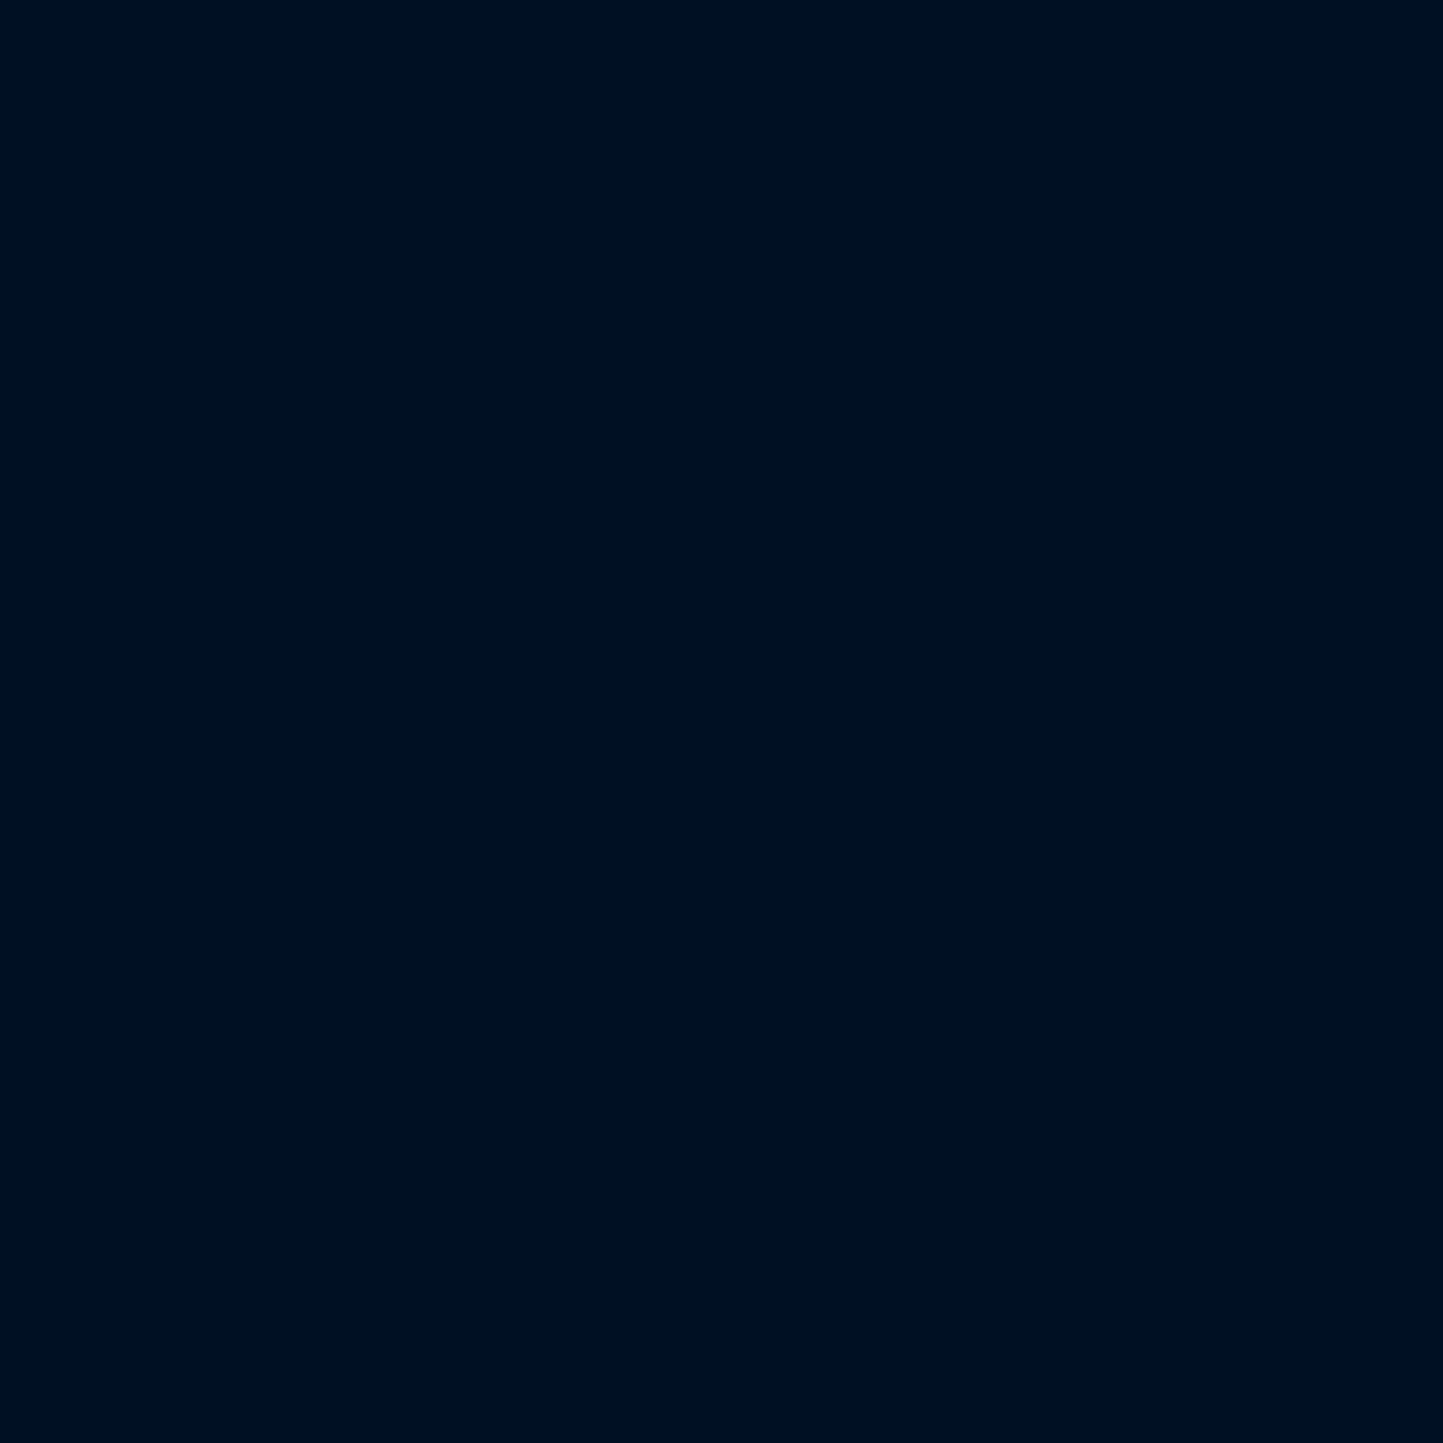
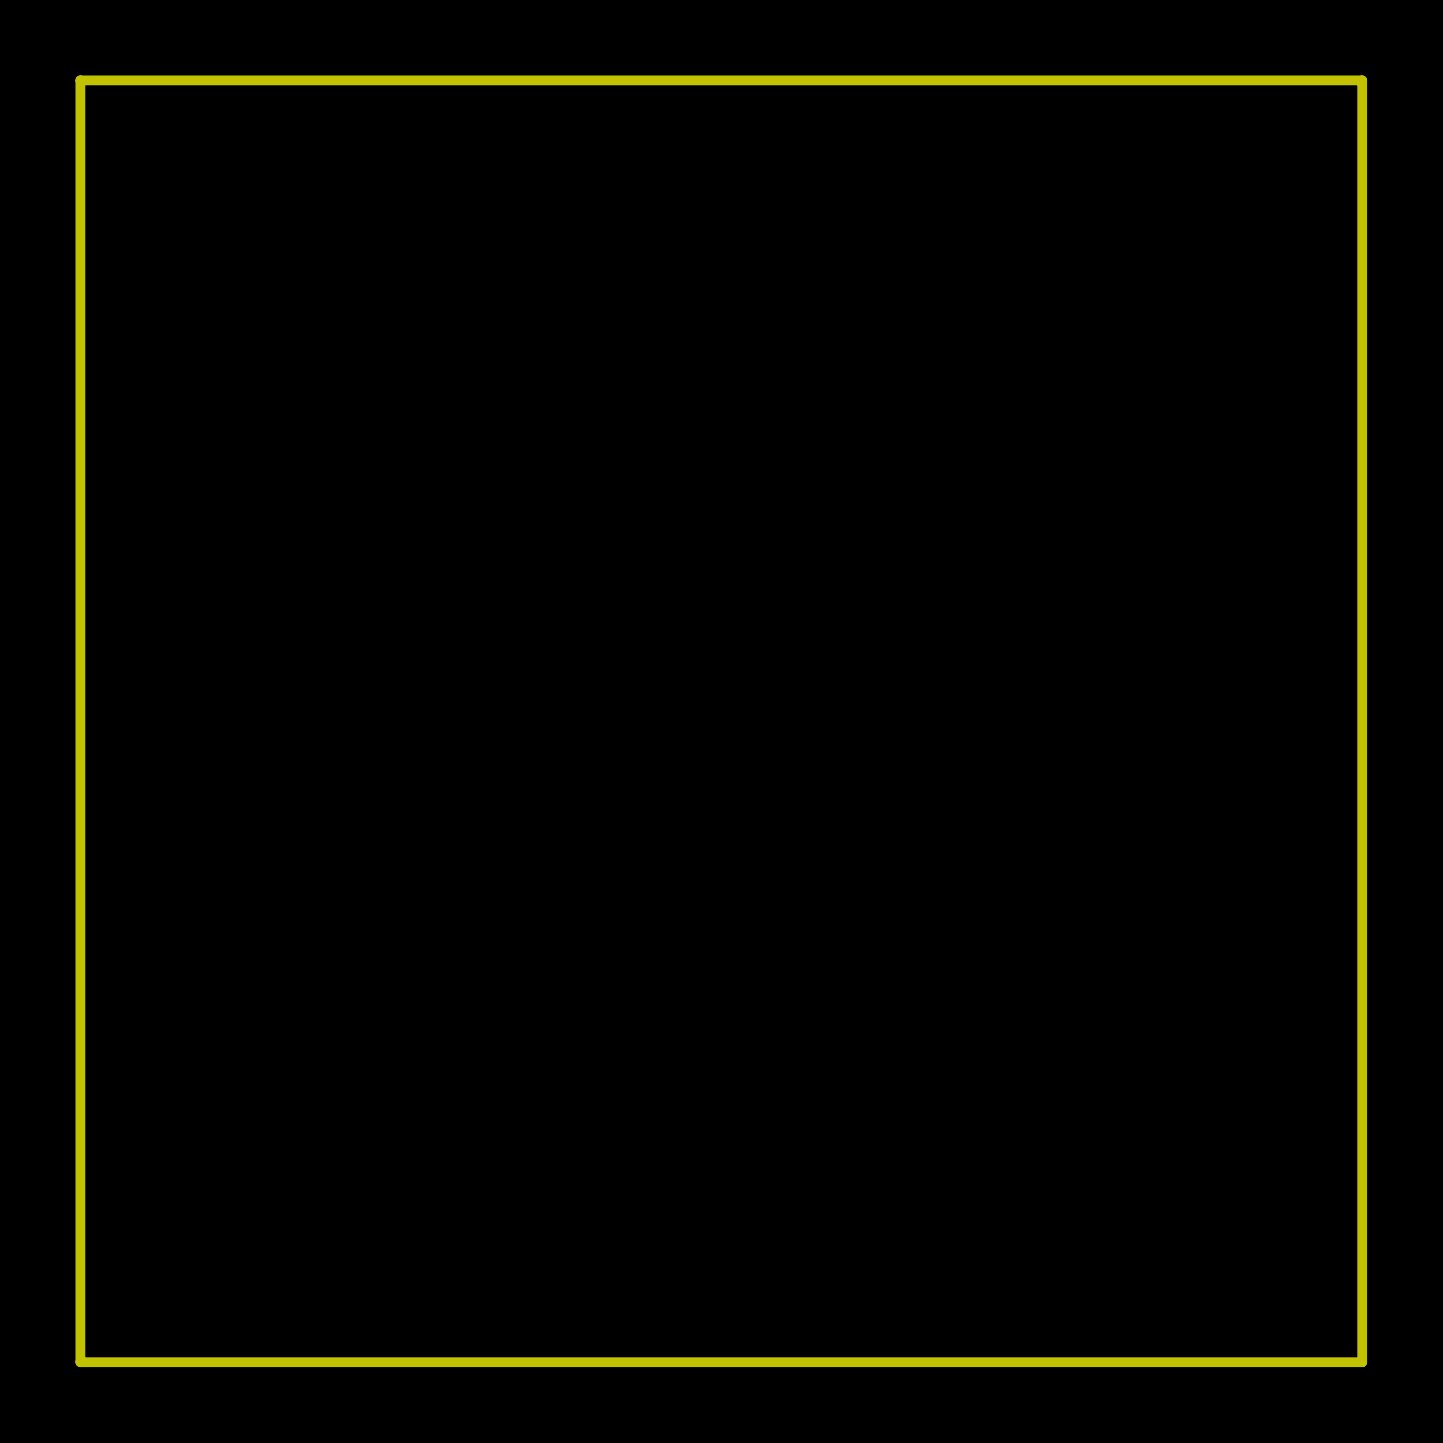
board edge: none -> (80, 80) (80, 1362) (1362, 1362) (1362, 80) (80, 80)

